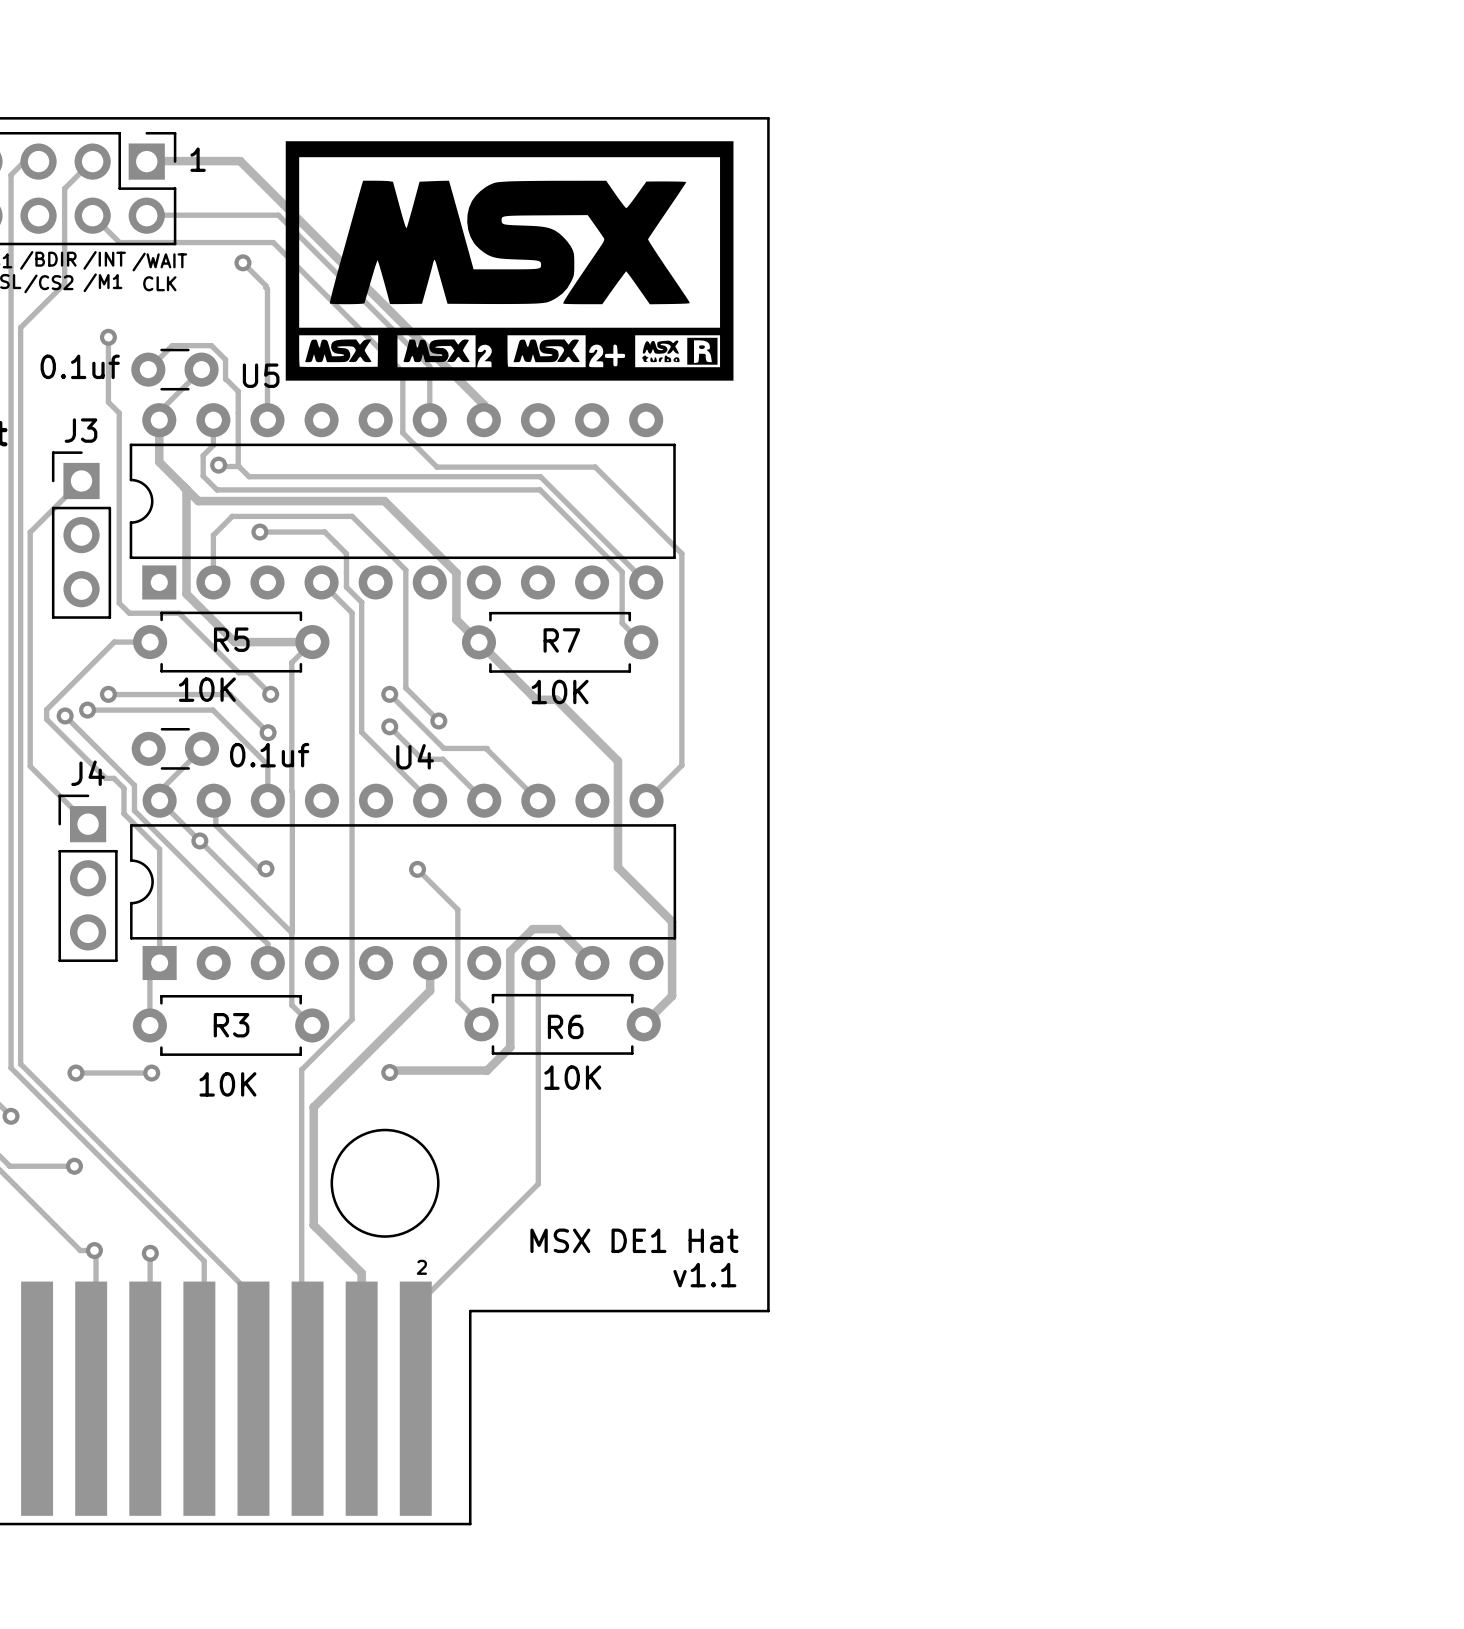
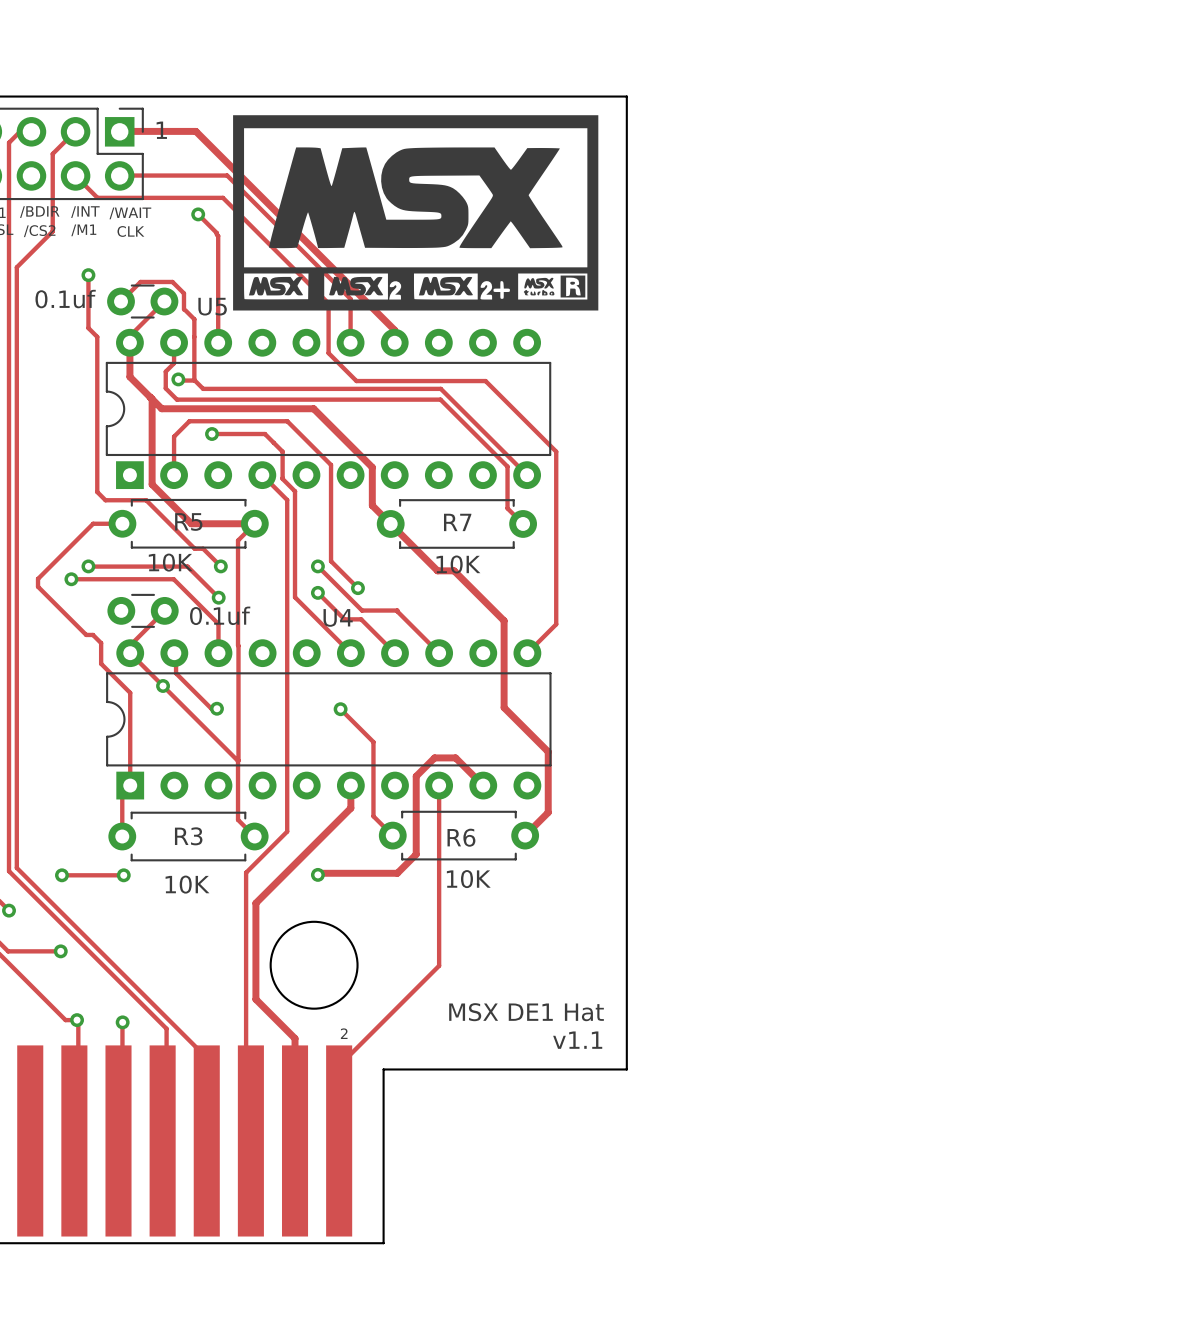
track: (81, 480) (30, 532) (30, 766) (88, 824) -> none
J3: (81, 535) -> none
track: (65, 715) (134, 785) (134, 810) (267, 944) (267, 963) -> none
via: (65, 715) -> none
J4: (88, 878) -> none

